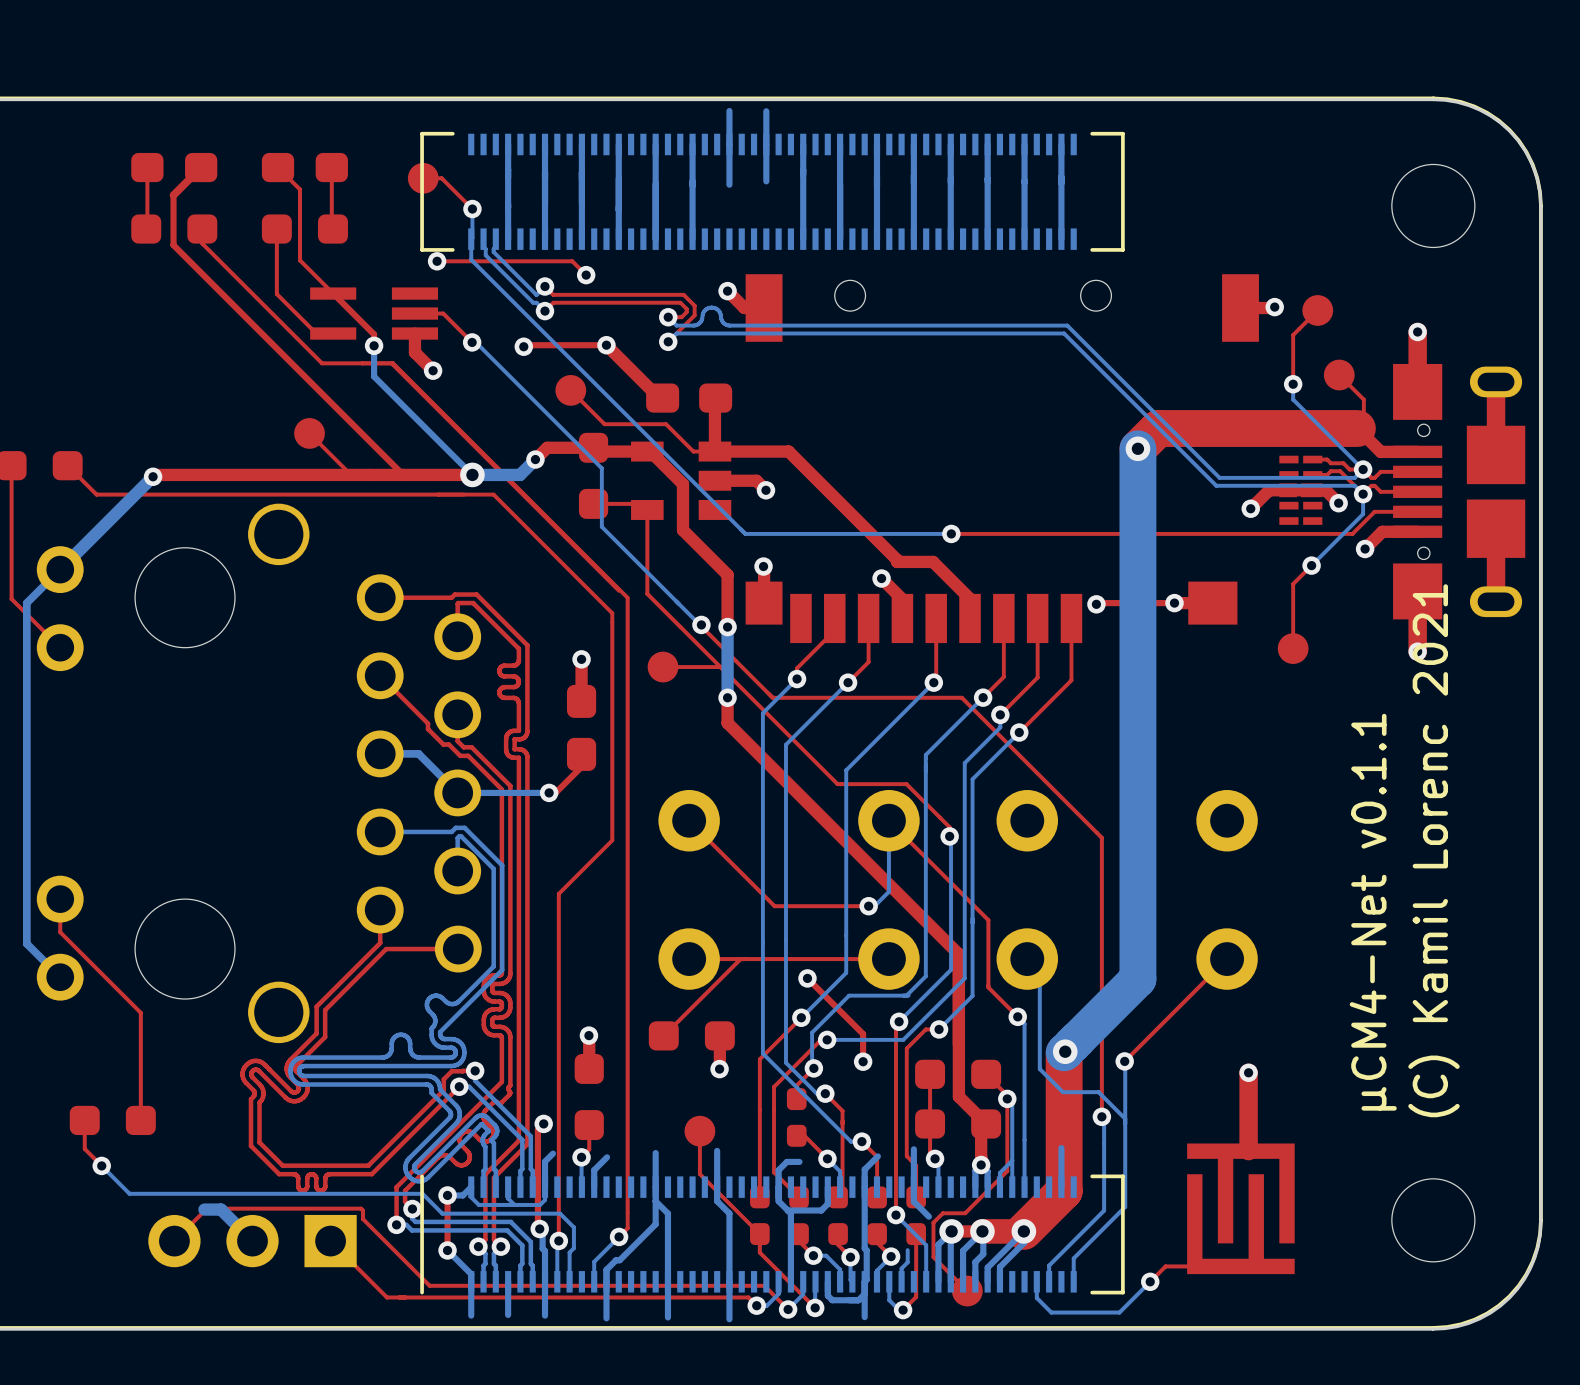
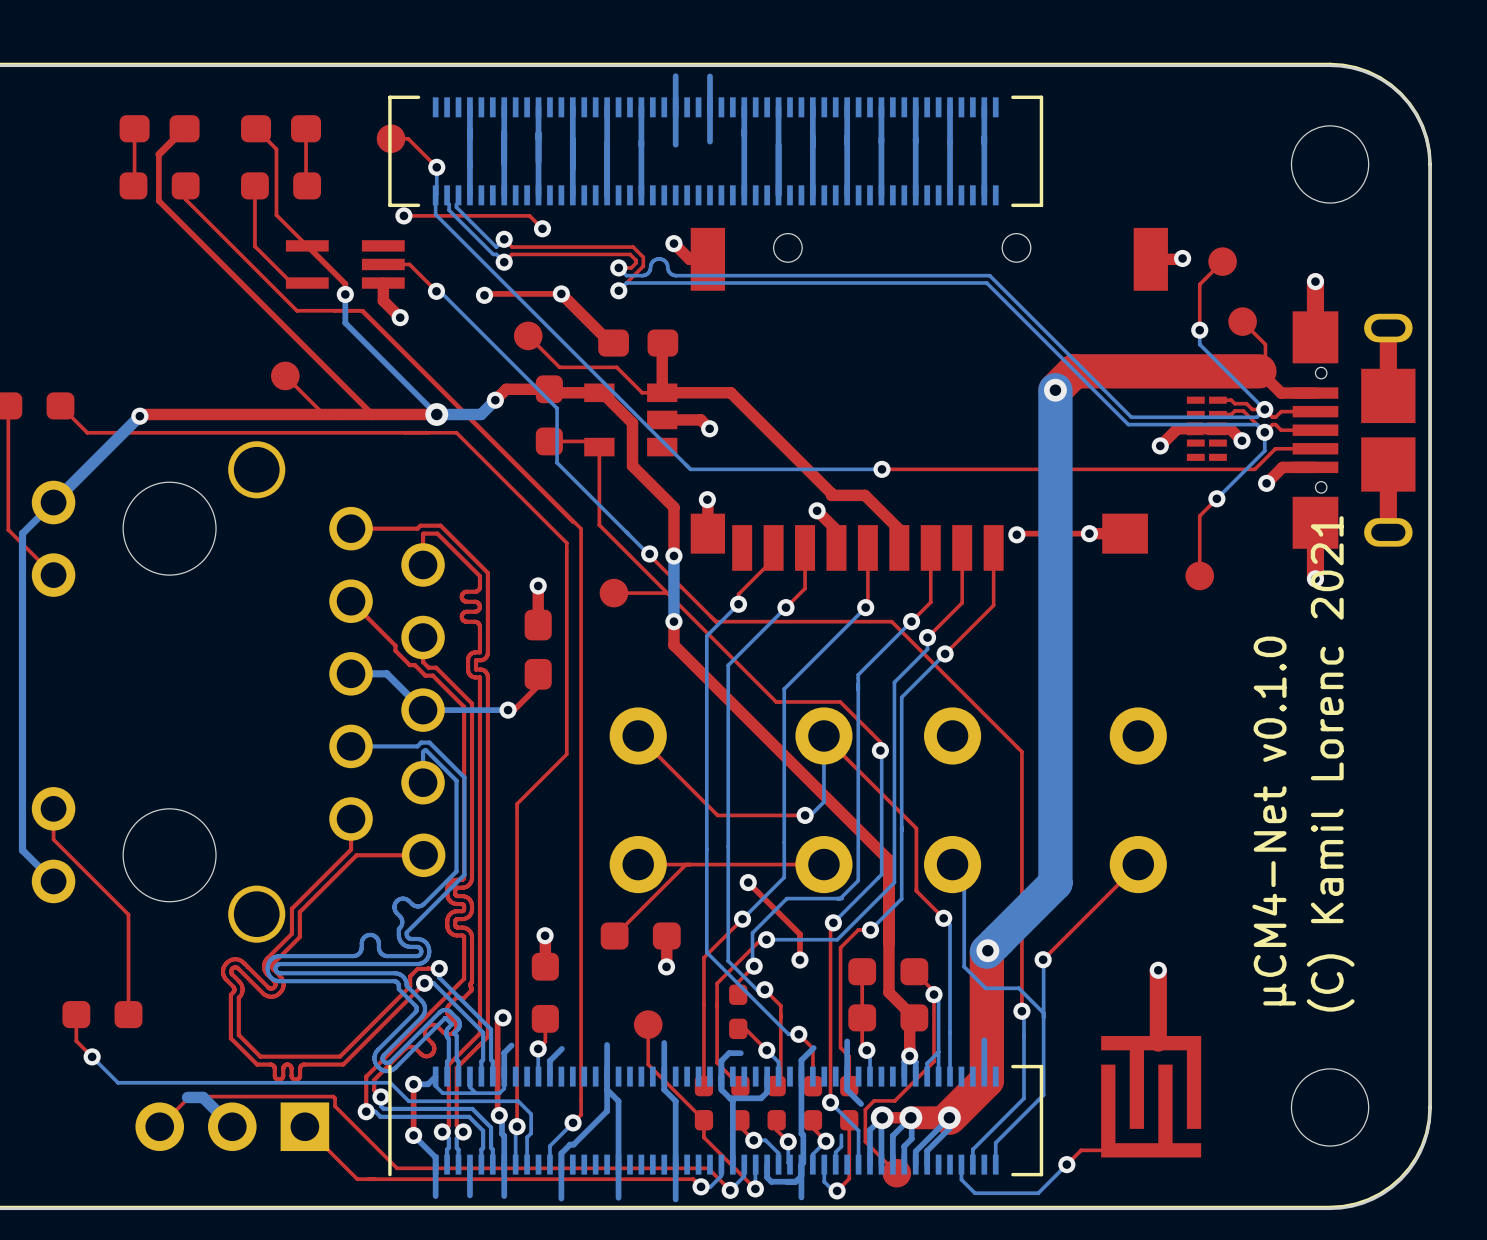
text: µCM4-Net v0.1.1 (1373, 912) -> µCM4-Net v0.1.0 (1274, 821)

